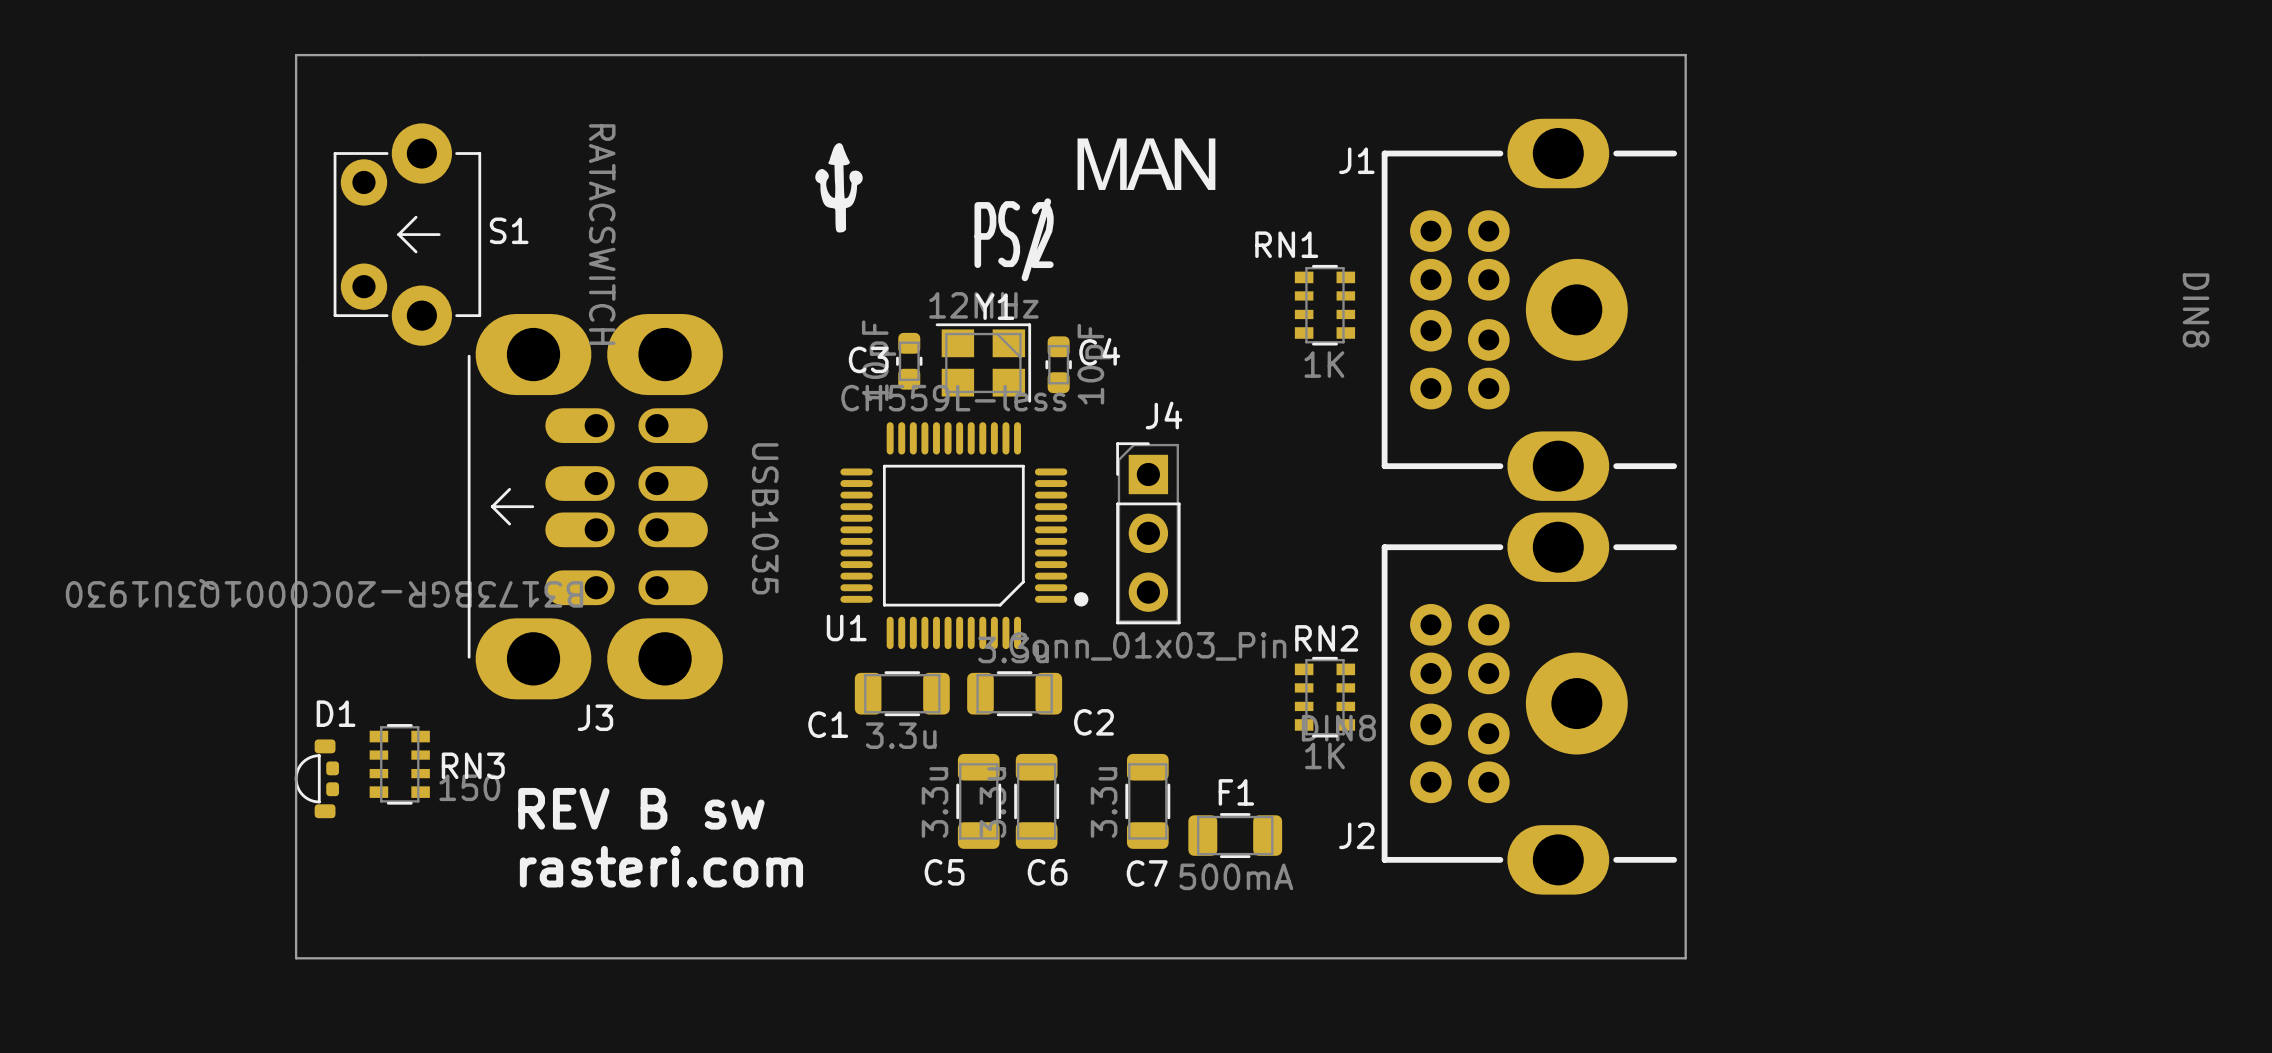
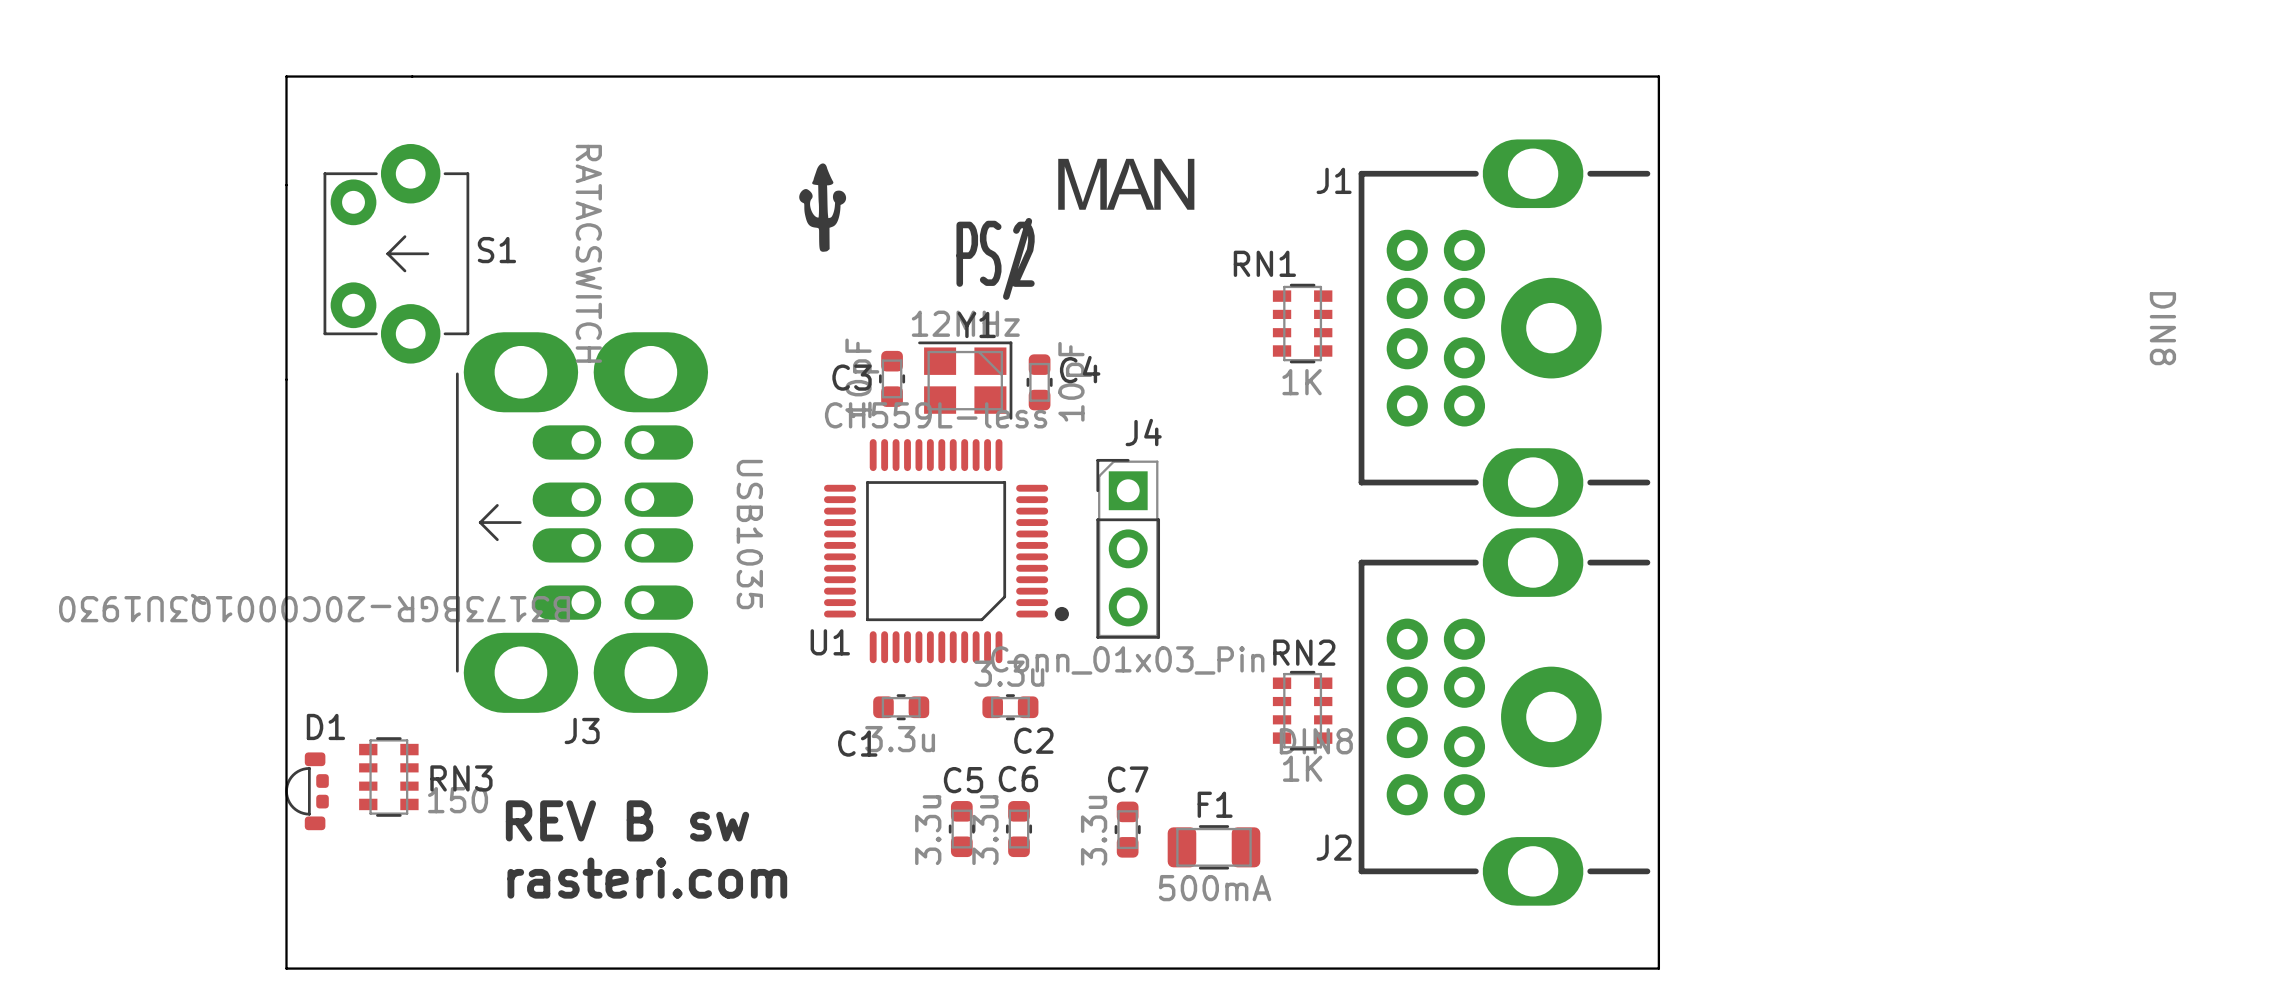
C1 footprint: [854, 671, 950, 717] -> [873, 694, 930, 721]
C2 footprint: [967, 671, 1063, 717] -> [982, 694, 1039, 721]
C2 name position: C2 (1093, 722) -> C2 (1033, 740)
C5 footprint: [956, 753, 1002, 849] -> [948, 801, 975, 858]
C6 footprint: [1014, 753, 1060, 849] -> [1005, 801, 1033, 858]
C7 footprint: [1125, 753, 1171, 849] -> [1114, 801, 1141, 858]
C5 name position: C5 (944, 872) -> C5 (963, 780)
C6 name position: C6 (1047, 872) -> C6 (1018, 779)
C7 name position: C7 (1147, 873) -> C7 (1128, 779)

